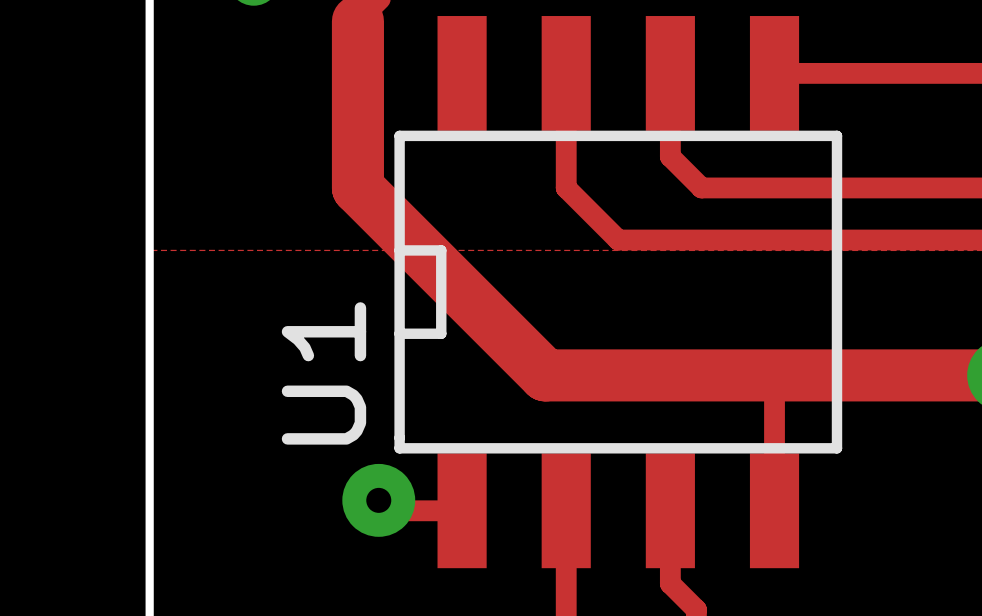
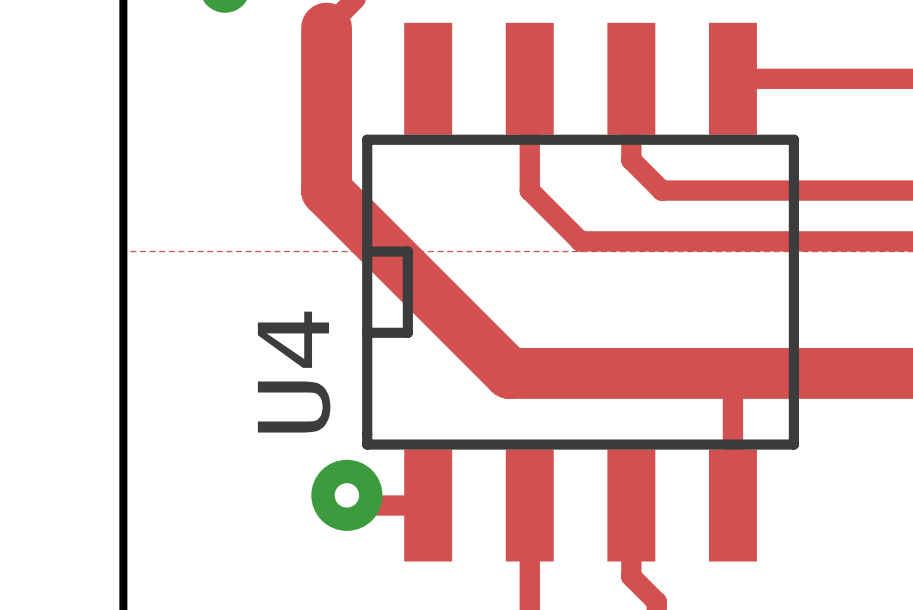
U1 name: U1 (323, 373) -> U4 (294, 372)

